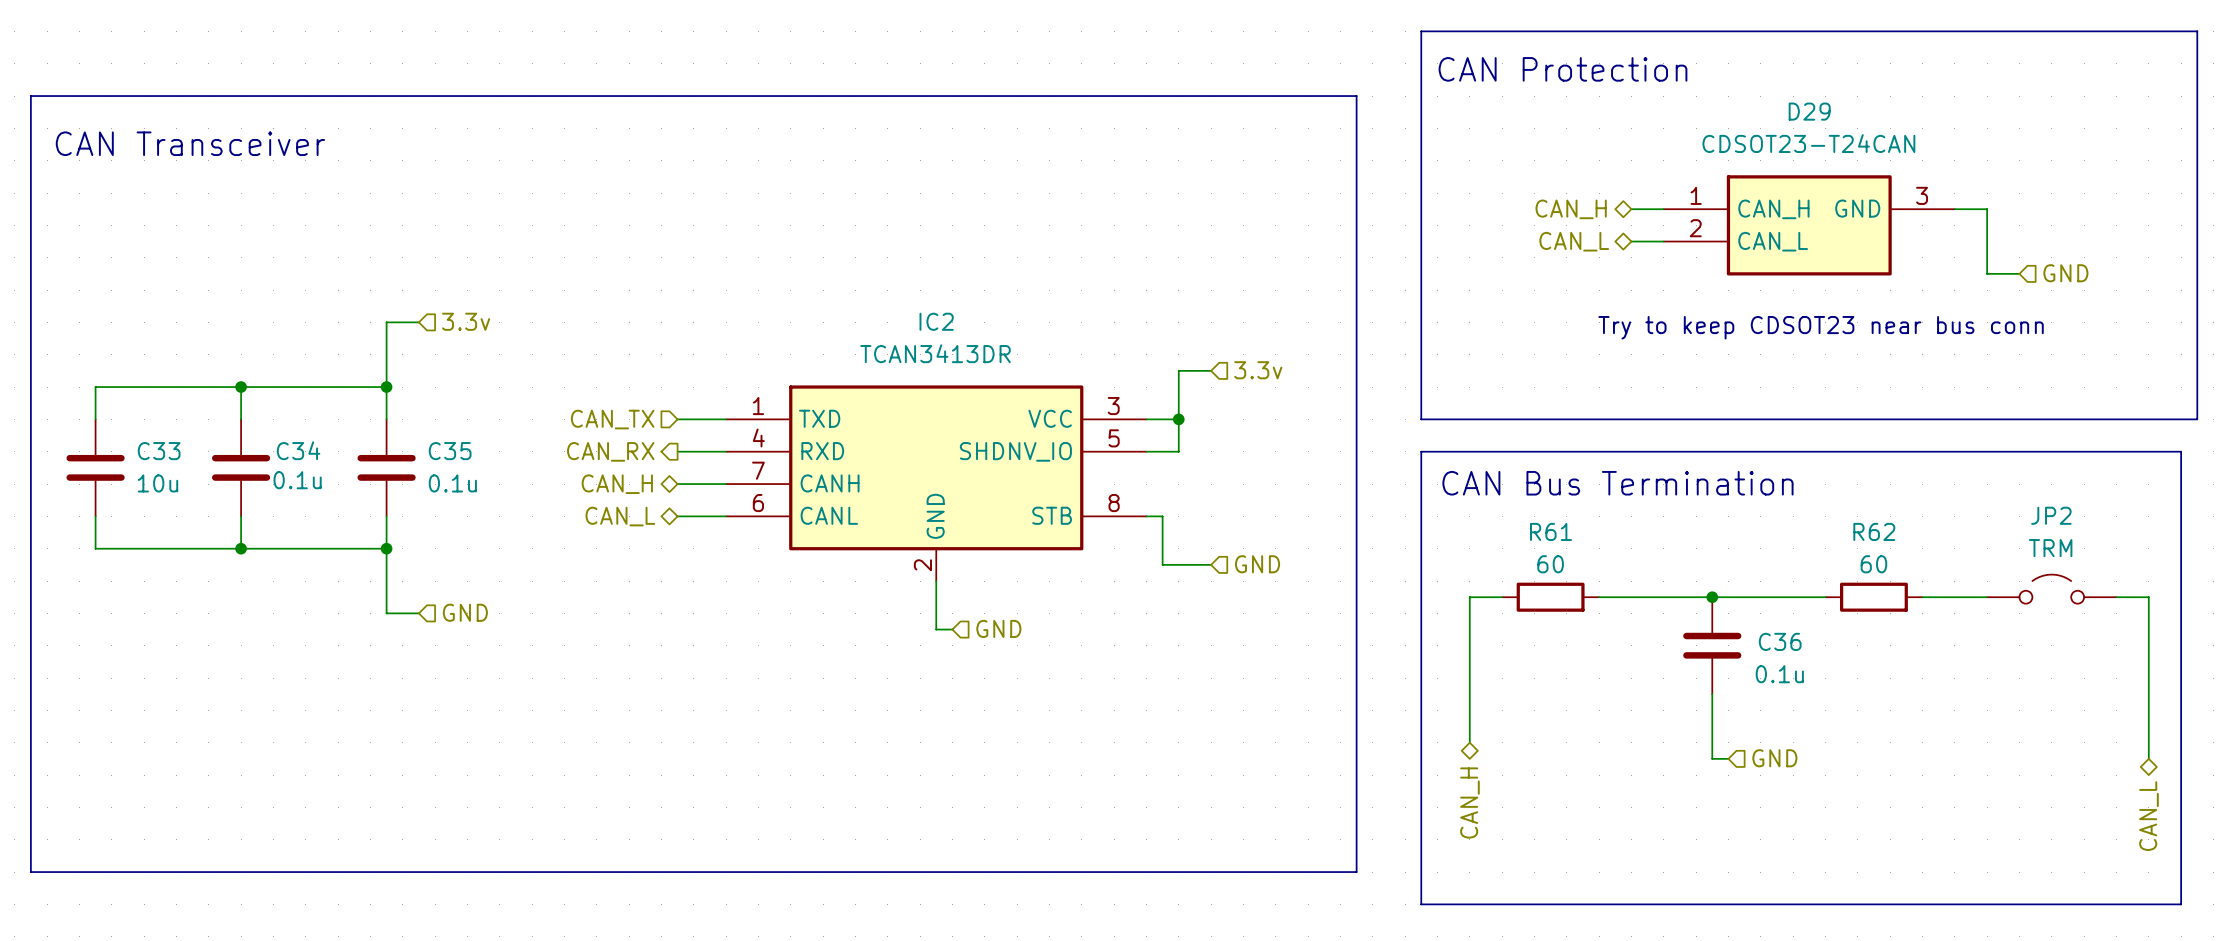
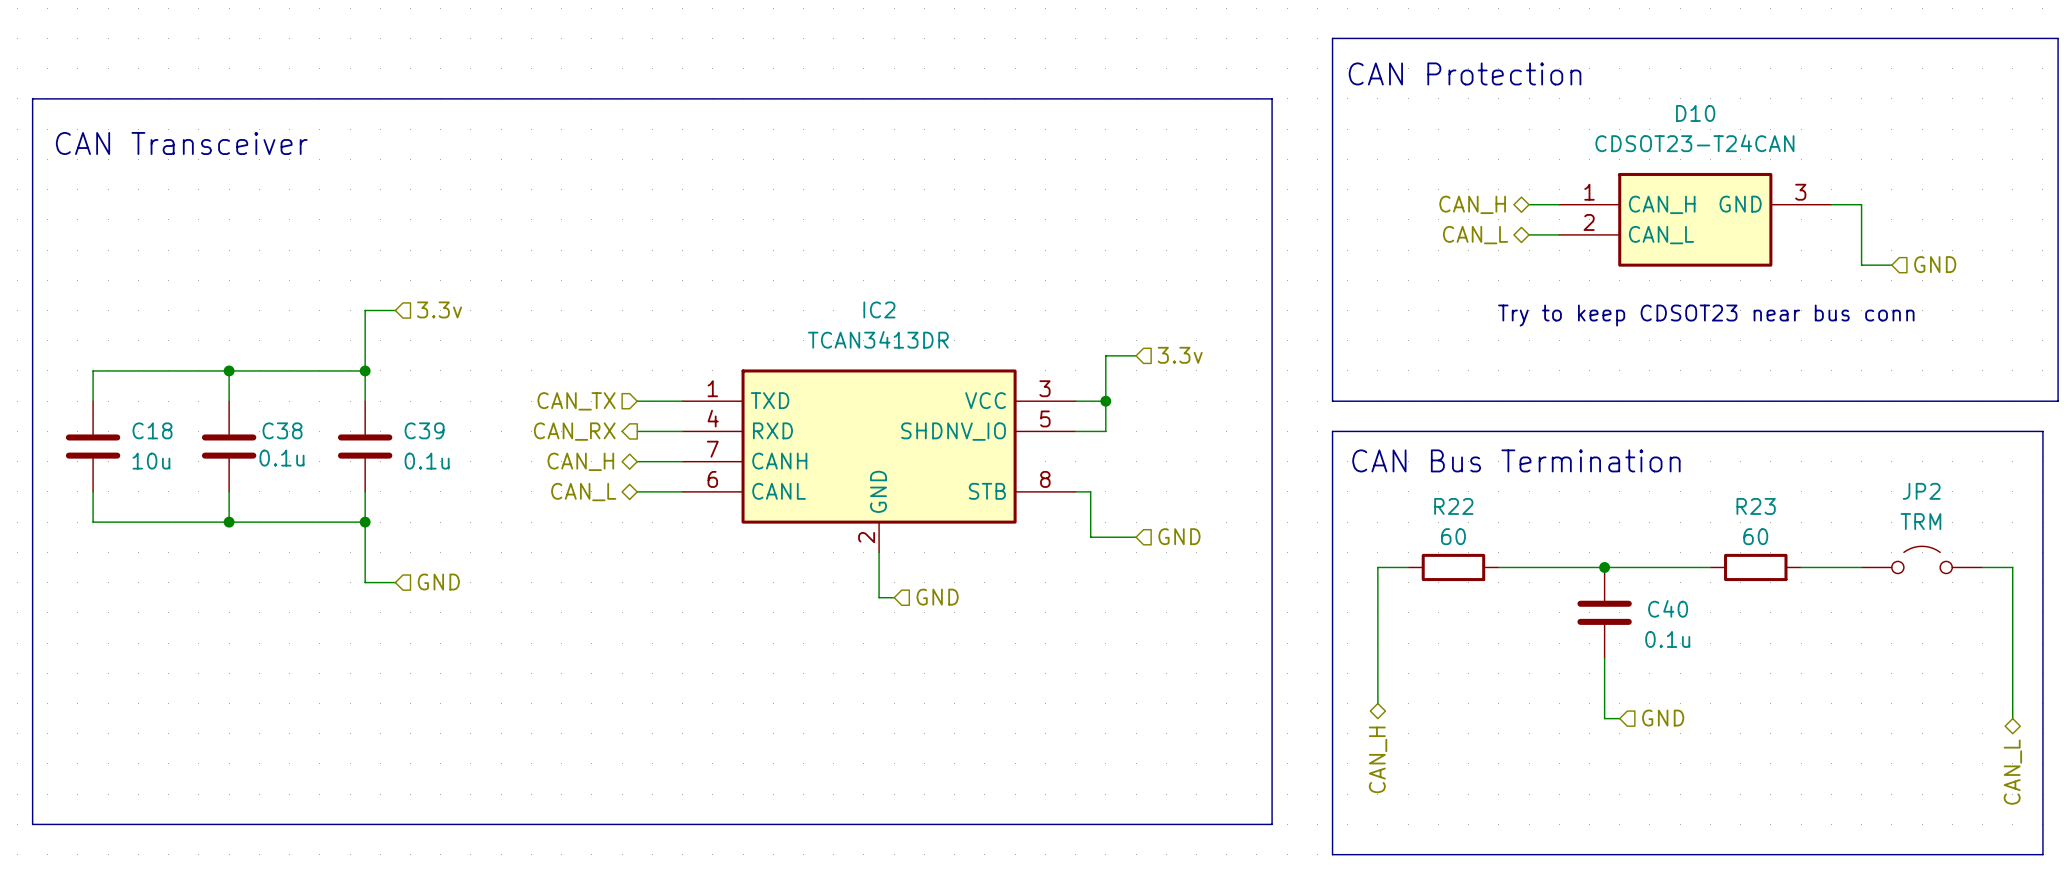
D29 name: D29 (1809, 111) -> D10 (1695, 113)
C34 name: C34 (298, 450) -> C38 (282, 430)
C33 name: C33 (159, 451) -> C18 (152, 430)
C35 name: C35 (450, 451) -> C39 (424, 430)
R61 name: R61 (1550, 531) -> R22 (1453, 506)
R62 name: R62 (1874, 531) -> R23 (1756, 506)
C36 name: C36 (1780, 641) -> C40 (1668, 608)

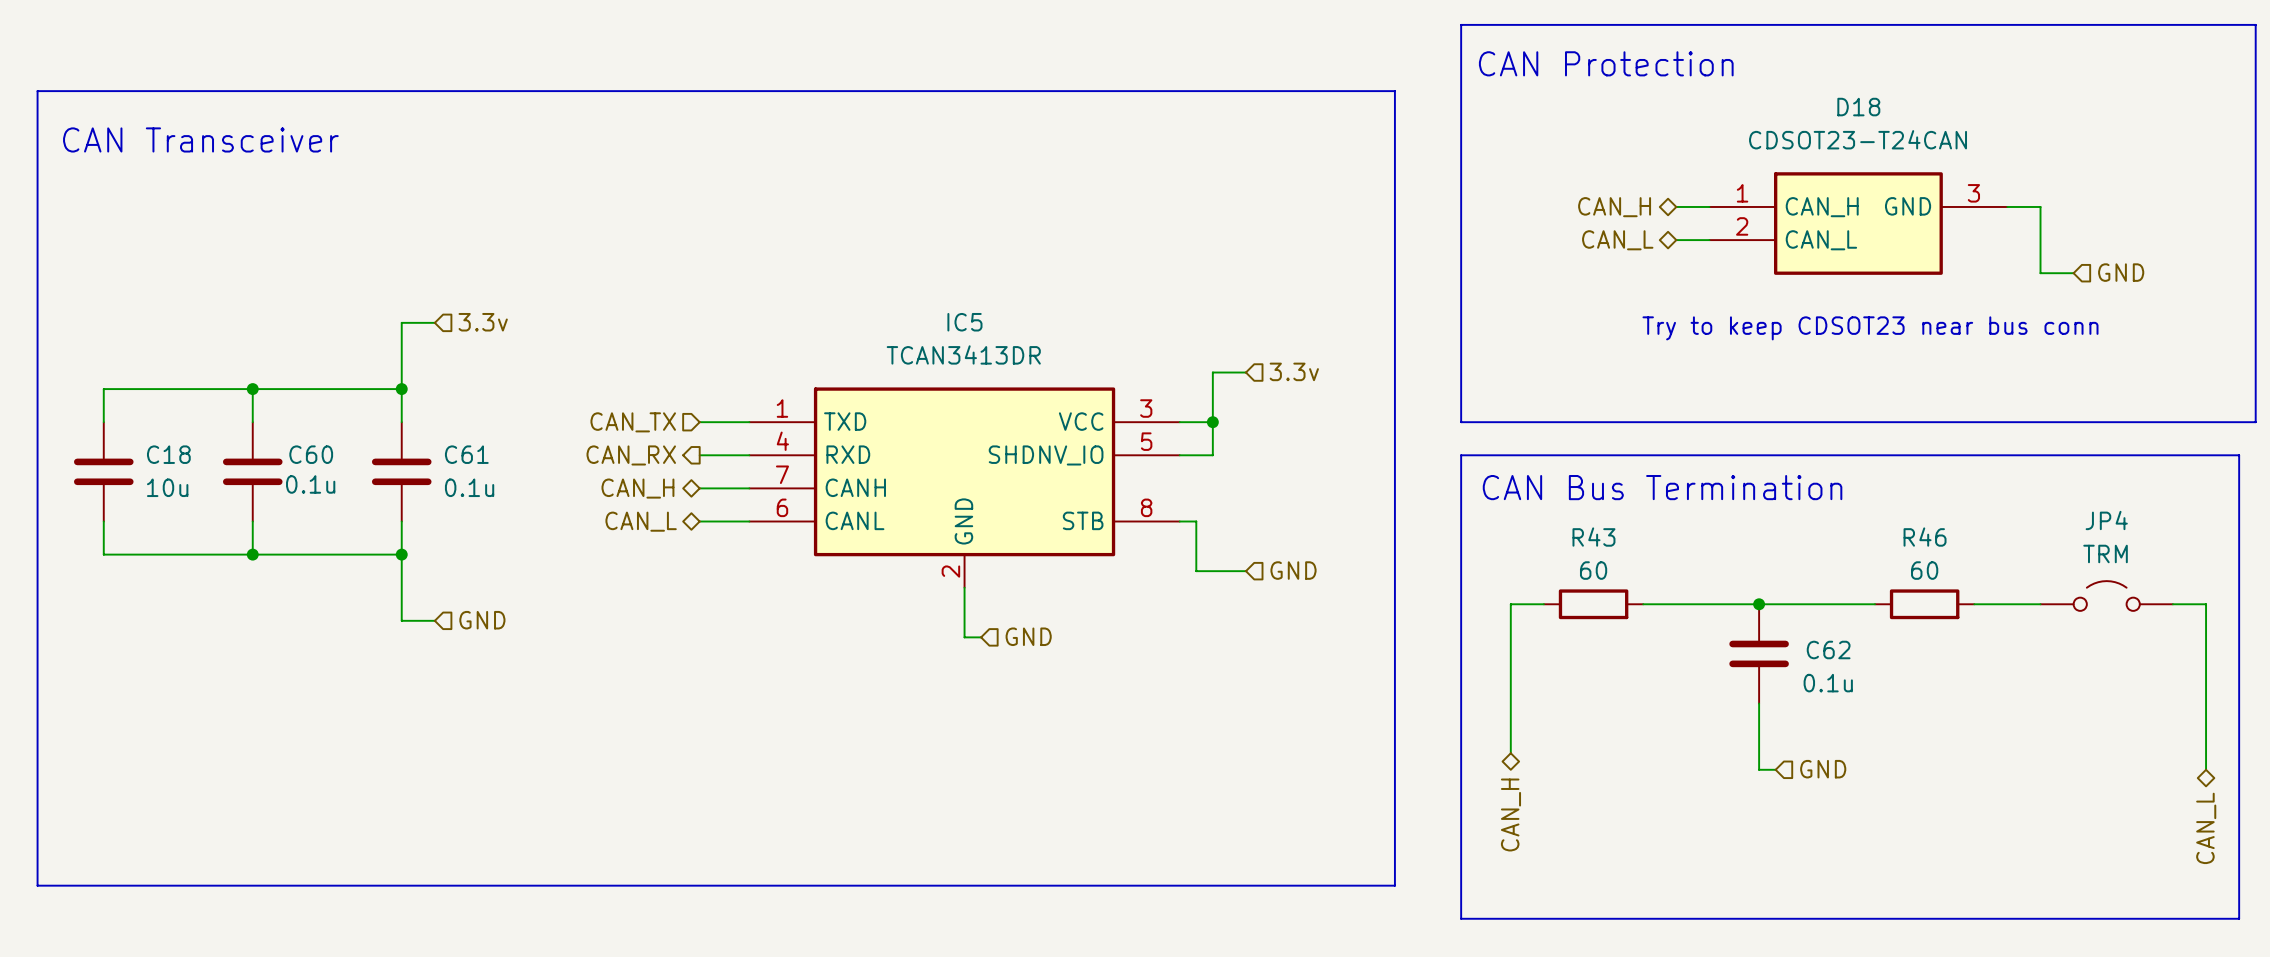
D10 name: D10 (1695, 113) -> D18 (1858, 107)
IC2 name: IC2 (879, 309) -> IC5 (964, 322)
C38 name: C38 (282, 430) -> C60 (311, 454)
C39 name: C39 (424, 430) -> C61 (466, 454)
JP2 name: JP2 (1921, 491) -> JP4 (2106, 520)
R22 name: R22 (1453, 506) -> R43 (1593, 537)
R23 name: R23 (1756, 506) -> R46 (1925, 537)
C40 name: C40 (1668, 608) -> C62 (1828, 650)

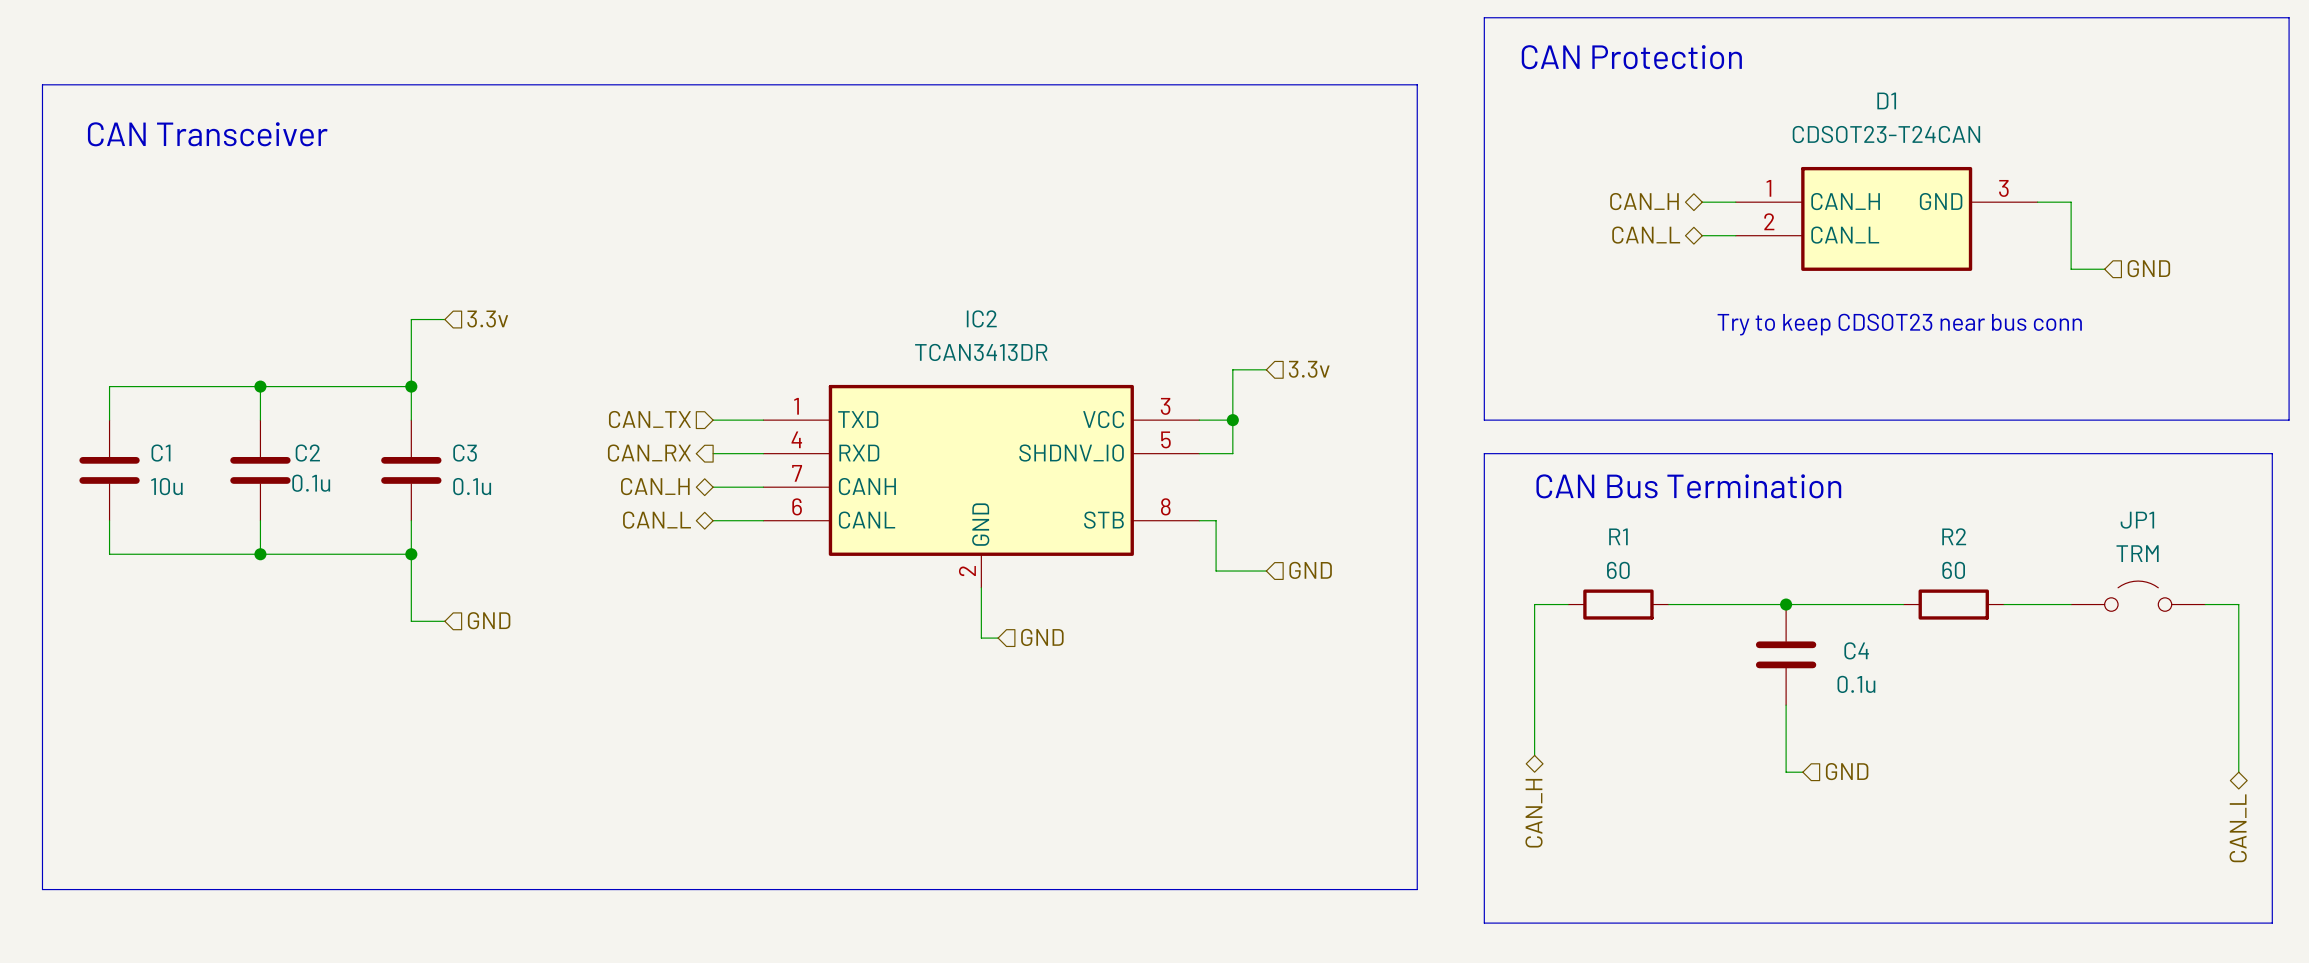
D18 name: D18 (1858, 107) -> D1 (1886, 100)
IC5 name: IC5 (964, 322) -> IC2 (981, 318)
C18 name: C18 (168, 454) -> C1 (160, 453)
C60 name: C60 (311, 454) -> C2 (307, 453)
C61 name: C61 (466, 454) -> C3 (465, 453)
JP4 name: JP4 (2106, 520) -> JP1 (2137, 520)
R43 name: R43 (1593, 537) -> R1 (1618, 536)
R46 name: R46 (1925, 537) -> R2 (1954, 536)
C62 name: C62 (1828, 650) -> C4 (1856, 650)

